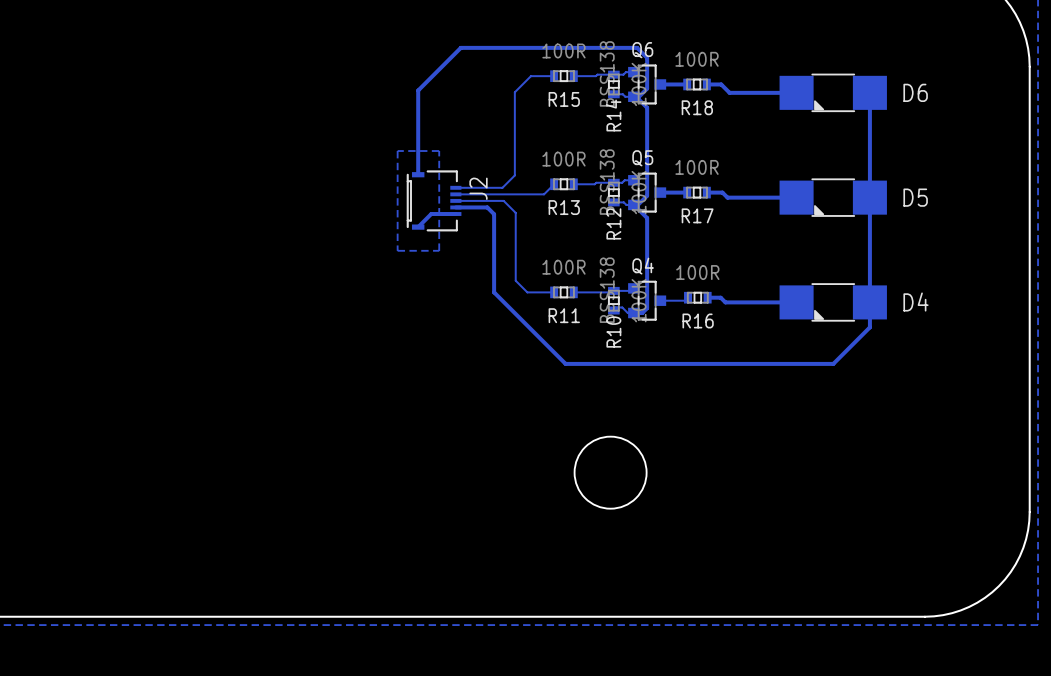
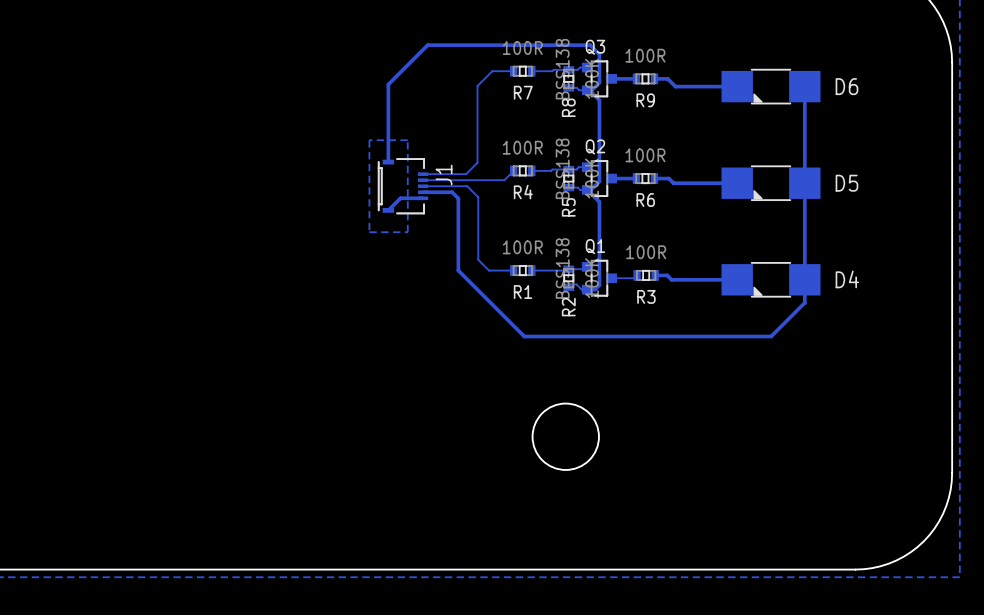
Q6 name: Q6 (642, 50) -> Q3 (595, 47)
R15 name: R15 (564, 99) -> R7 (523, 92)
R18 name: R18 (697, 107) -> R9 (645, 100)
R14 name: R14 (613, 115) -> R8 (568, 107)
Q5 name: Q5 (642, 158) -> Q2 (595, 146)
J2 name: J2 (478, 188) -> J1 (443, 175)
R13 name: R13 (564, 207) -> R4 (523, 192)
R17 name: R17 (697, 215) -> R6 (645, 200)
R12 name: R12 (613, 223) -> R5 (568, 207)
Q4 name: Q4 (643, 266) -> Q1 (595, 246)
R11 name: R11 (564, 315) -> R1 (523, 292)
R16 name: R16 (698, 320) -> R3 (646, 296)
R10 name: R10 (613, 332) -> R2 (568, 307)

